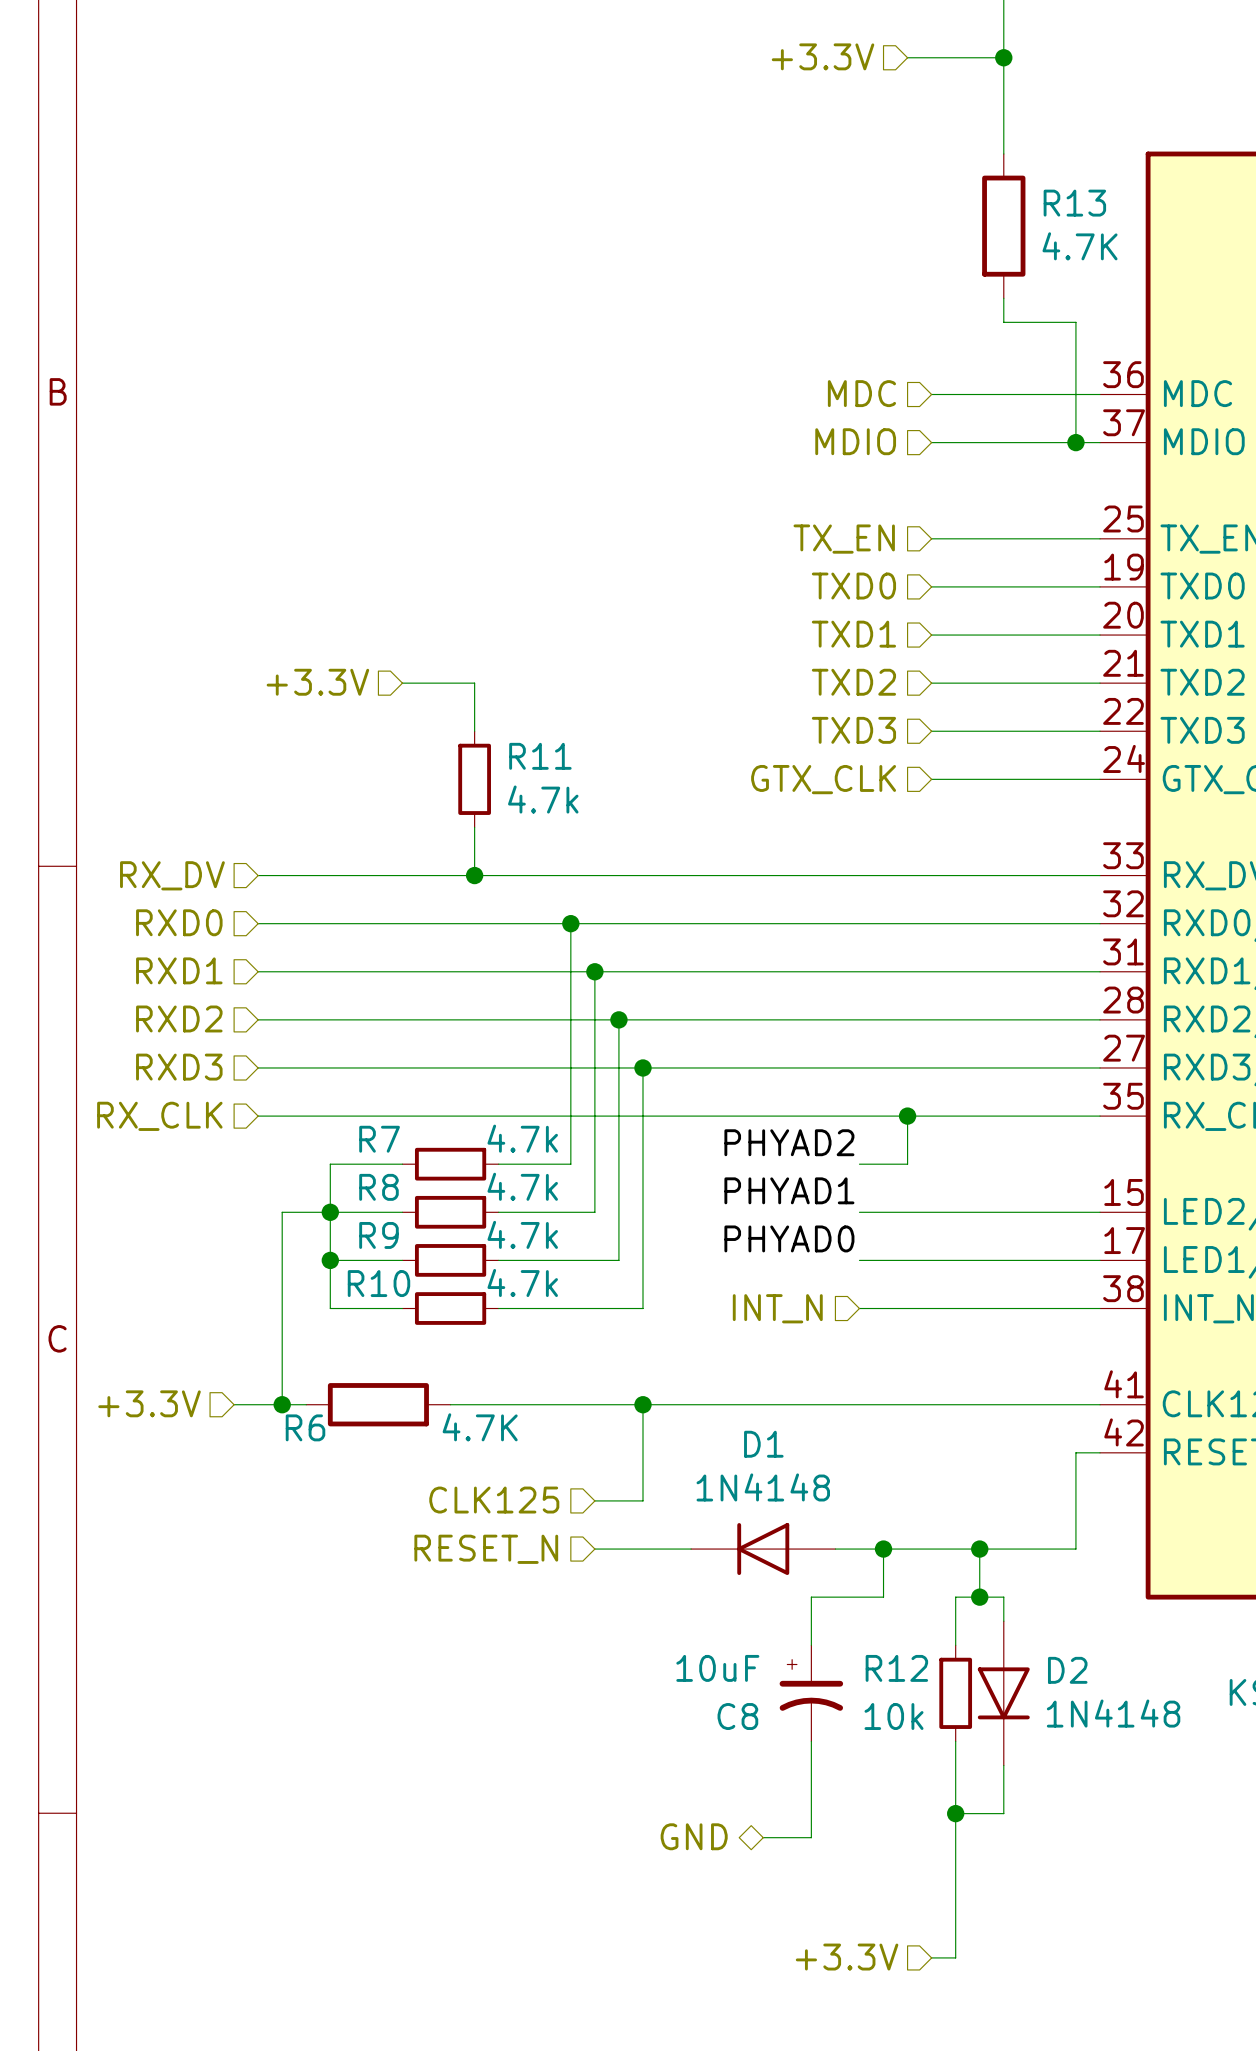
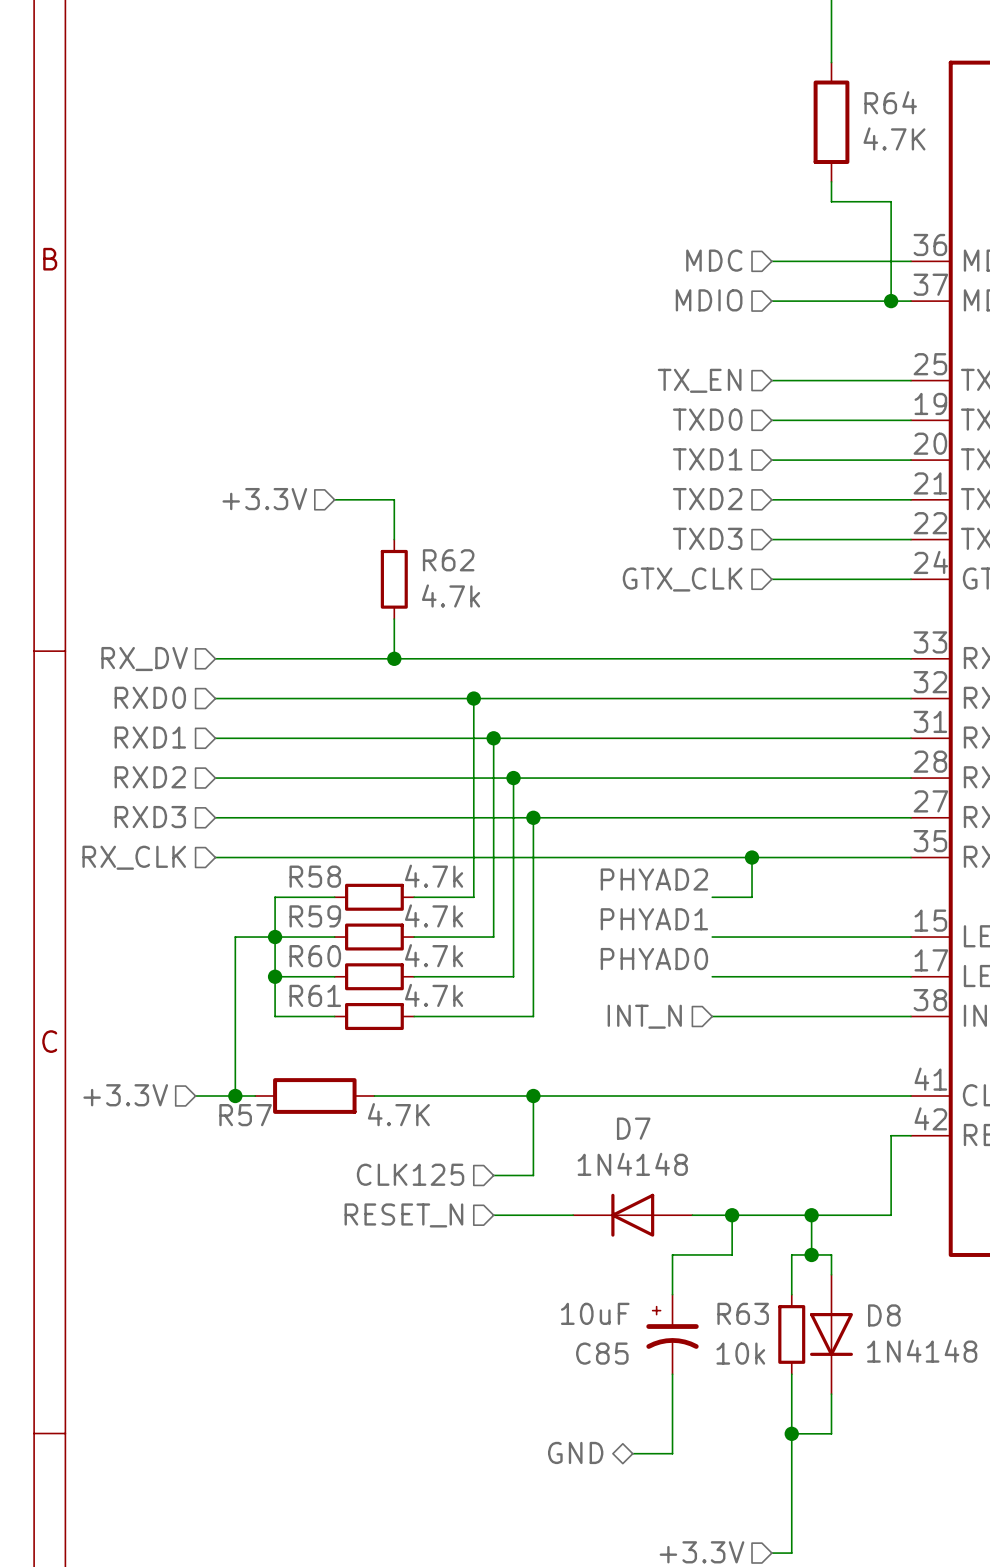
R13 name: R13 (1074, 203) -> R64 (890, 102)
R11 name: R11 (540, 756) -> R62 (448, 560)
R7 name: R7 (379, 1139) -> R58 (315, 876)
R8 name: R8 (378, 1187) -> R59 (315, 916)
R9 name: R9 (378, 1235) -> R60 (315, 956)
R10 name: R10 (378, 1283) -> R61 (315, 995)
R6 name: R6 (305, 1427) -> R57 (245, 1115)
D1 name: D1 (763, 1444) -> D7 (633, 1128)
R12 name: R12 (896, 1668) -> R63 (743, 1313)
D2 name: D2 (1067, 1670) -> D8 (884, 1315)
C8 name: C8 (737, 1716) -> C85 (602, 1353)

